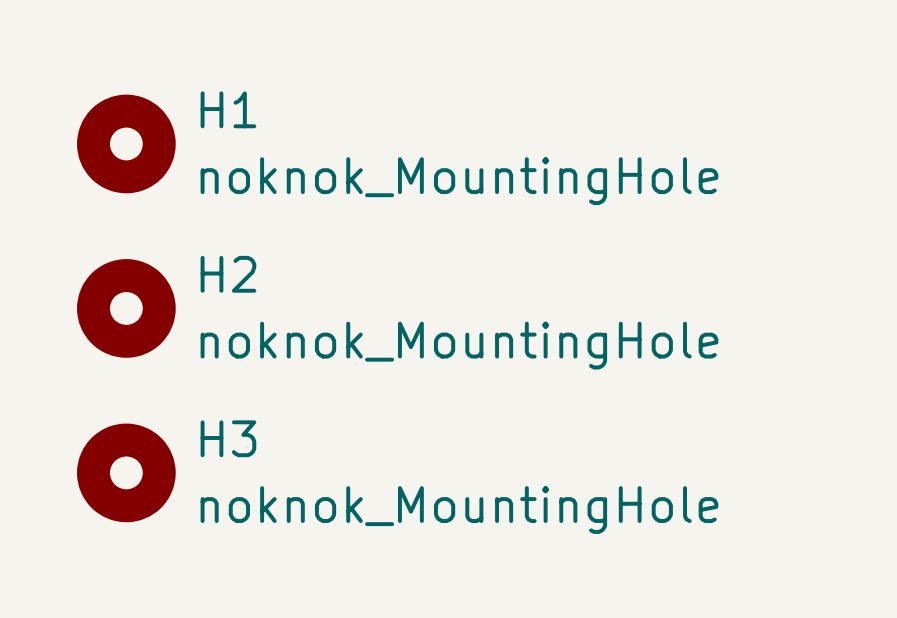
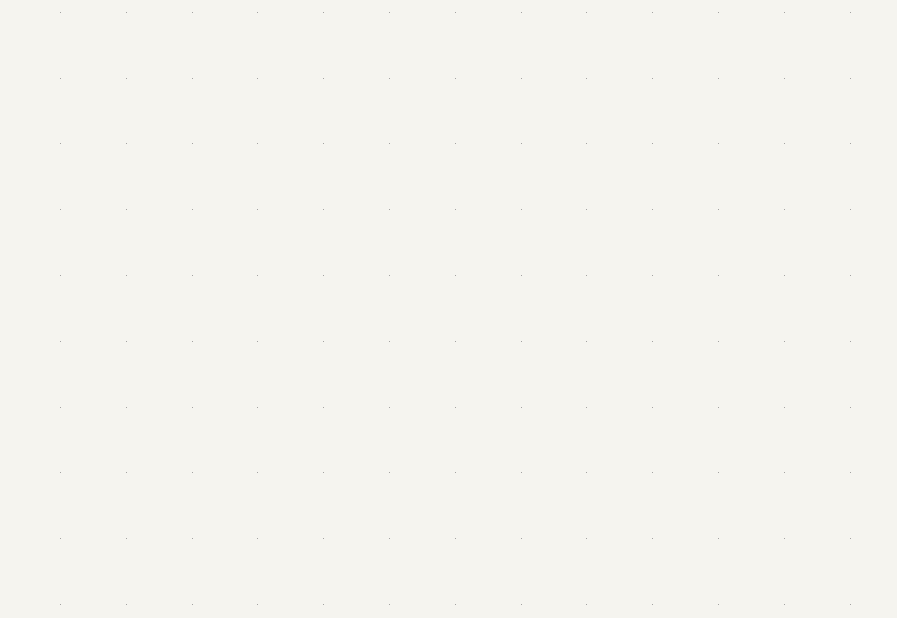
H1: noknok_MountingHole (126, 143) -> none
H2: noknok_MountingHole (126, 308) -> none
H3: noknok_MountingHole (126, 472) -> none

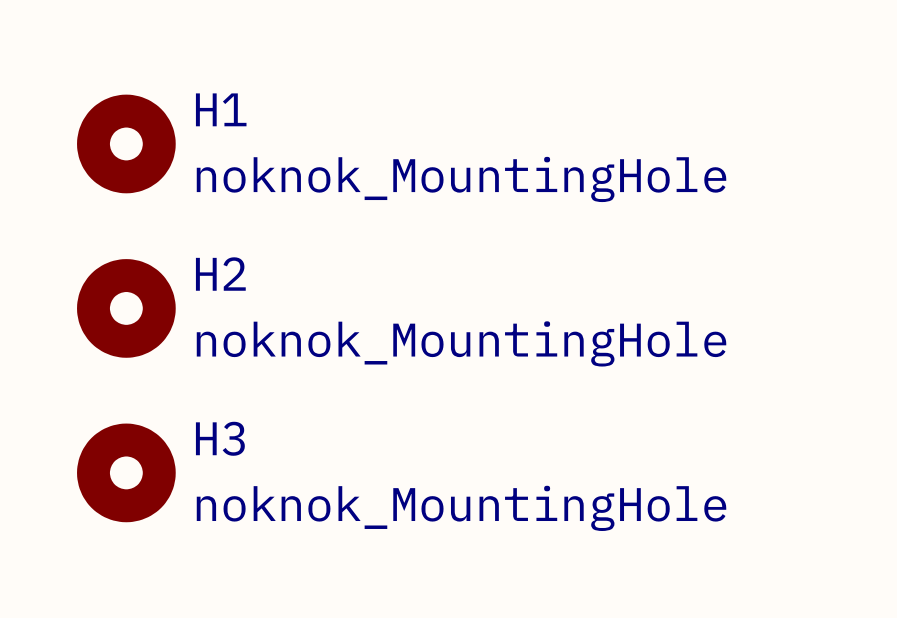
H1: none -> noknok_MountingHole (126, 143)
H2: none -> noknok_MountingHole (126, 308)
H3: none -> noknok_MountingHole (126, 472)

